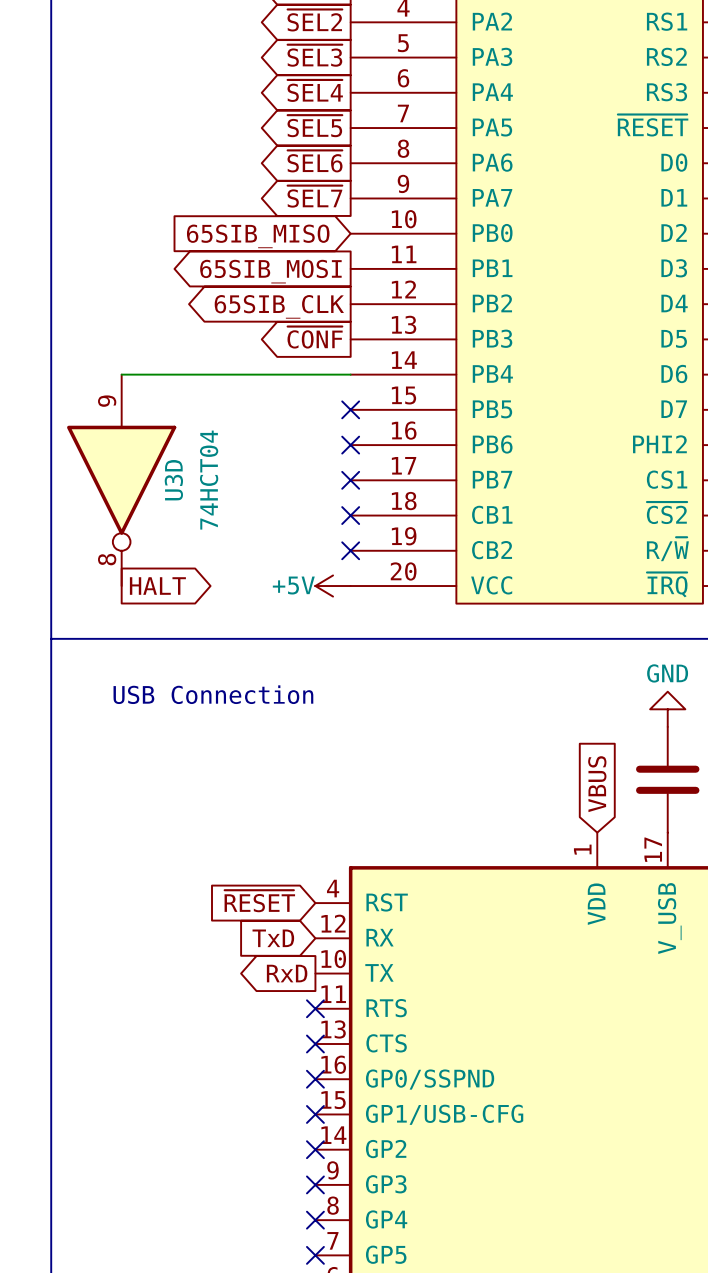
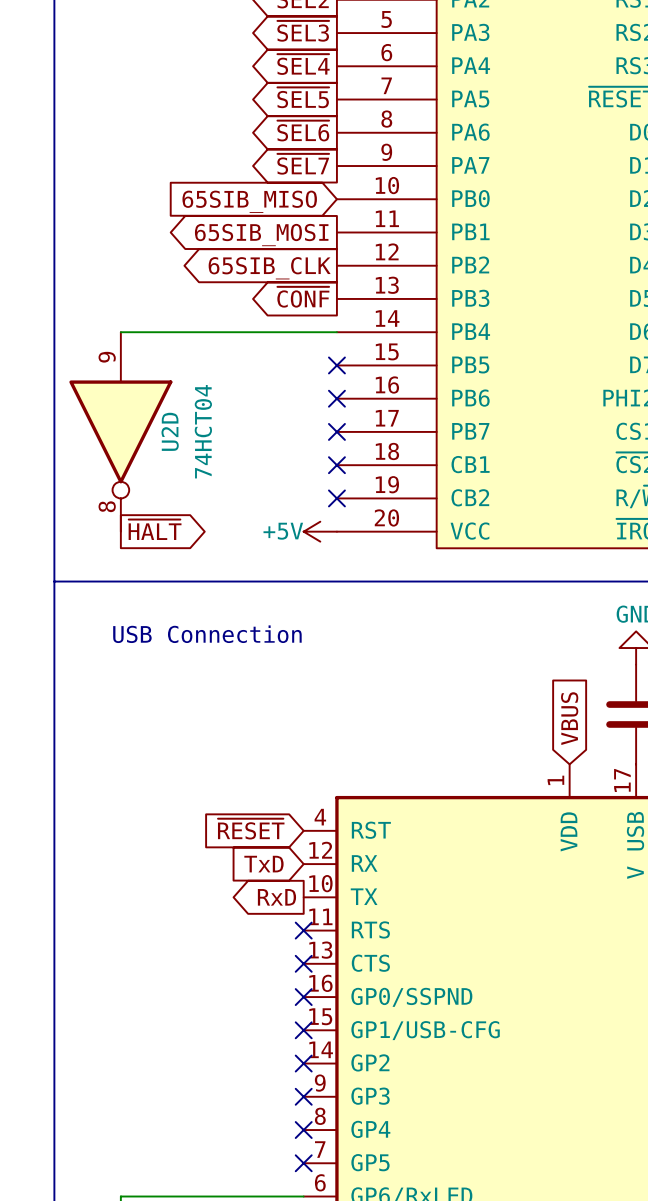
U3D name: U3D (173, 480) -> U2D (170, 431)
global label: HALT (157, 586) -> ~{HALT} (155, 529)

